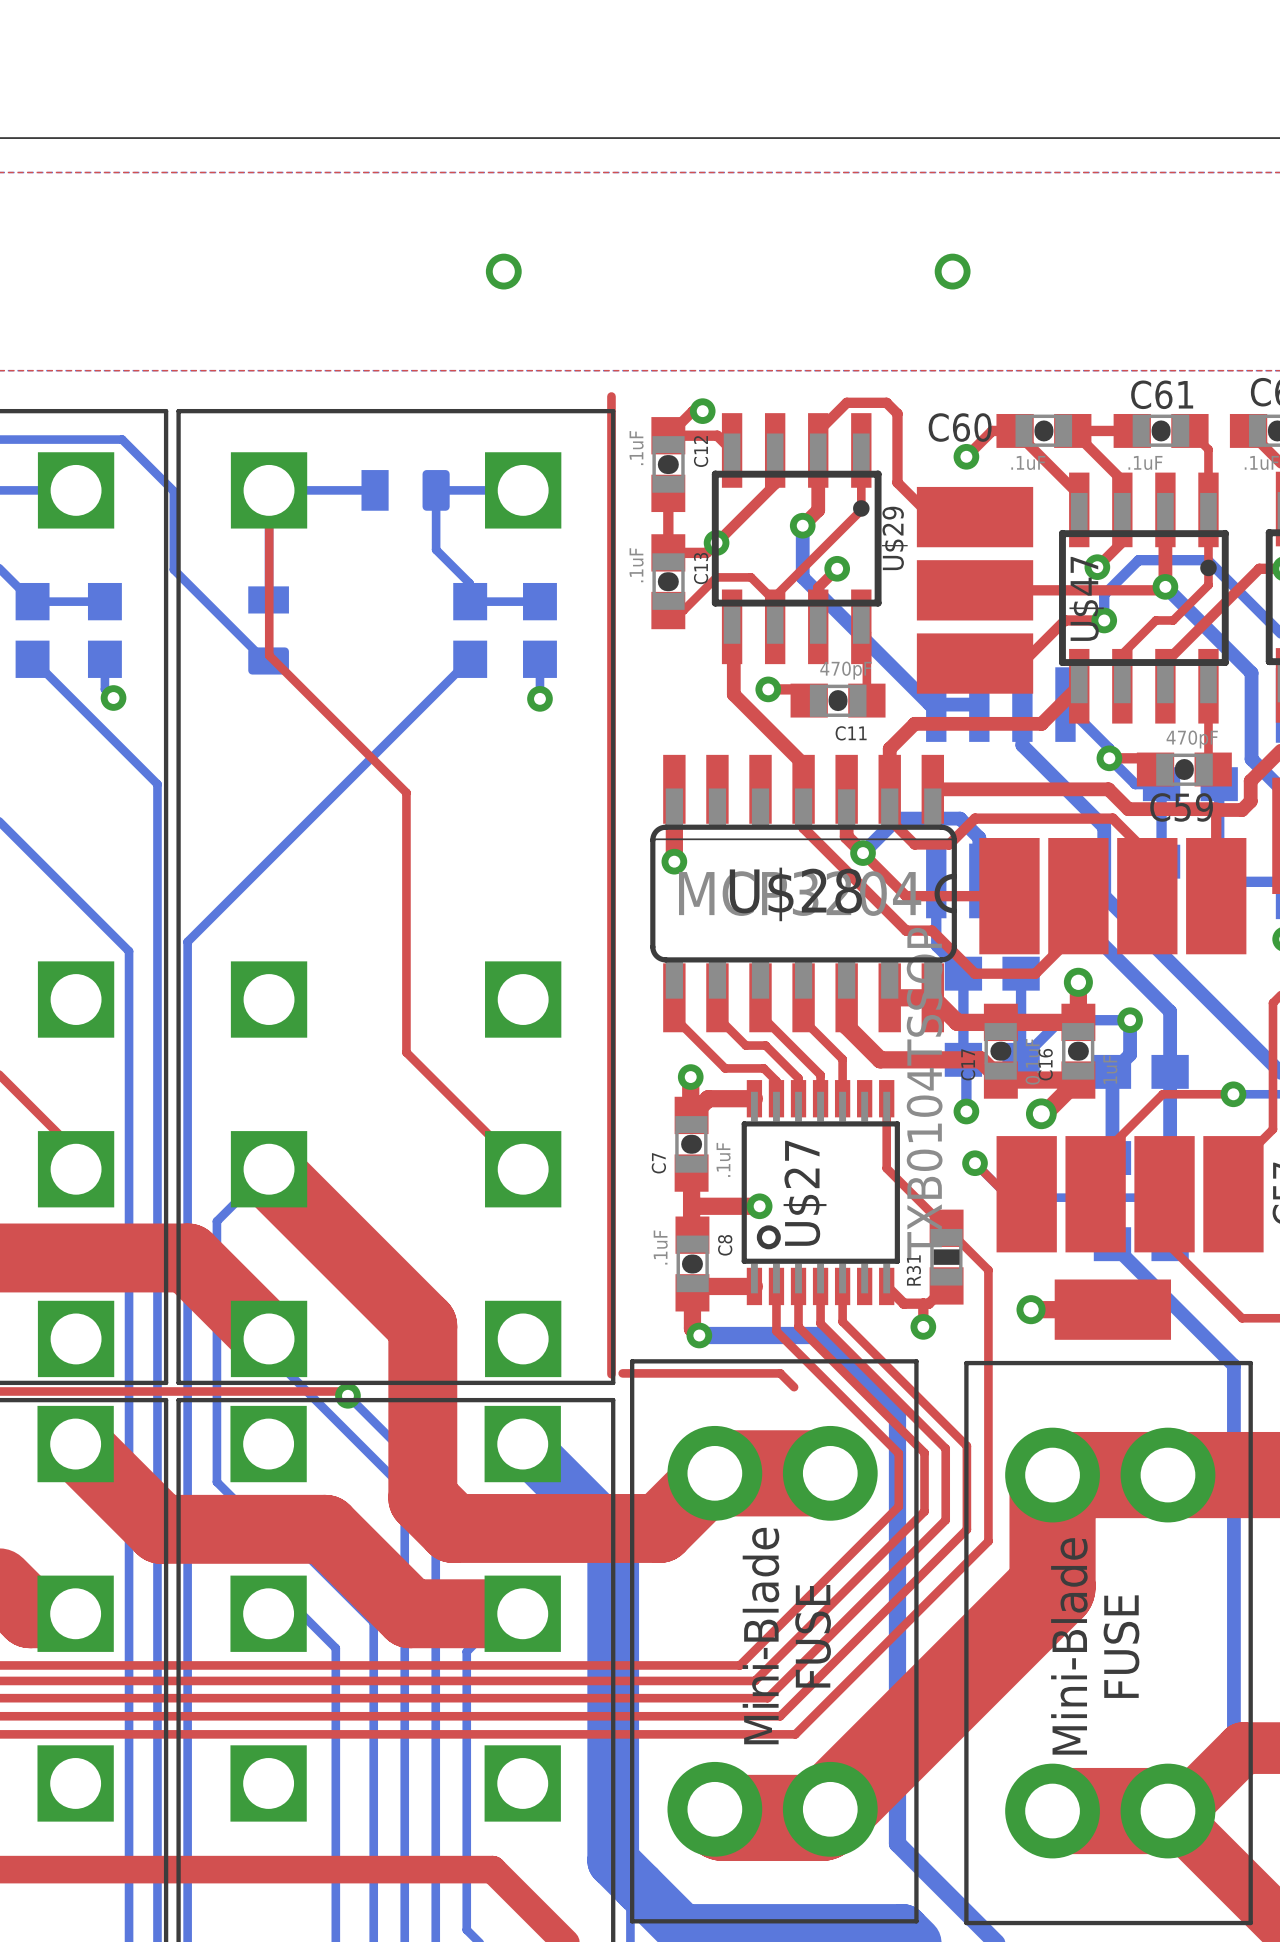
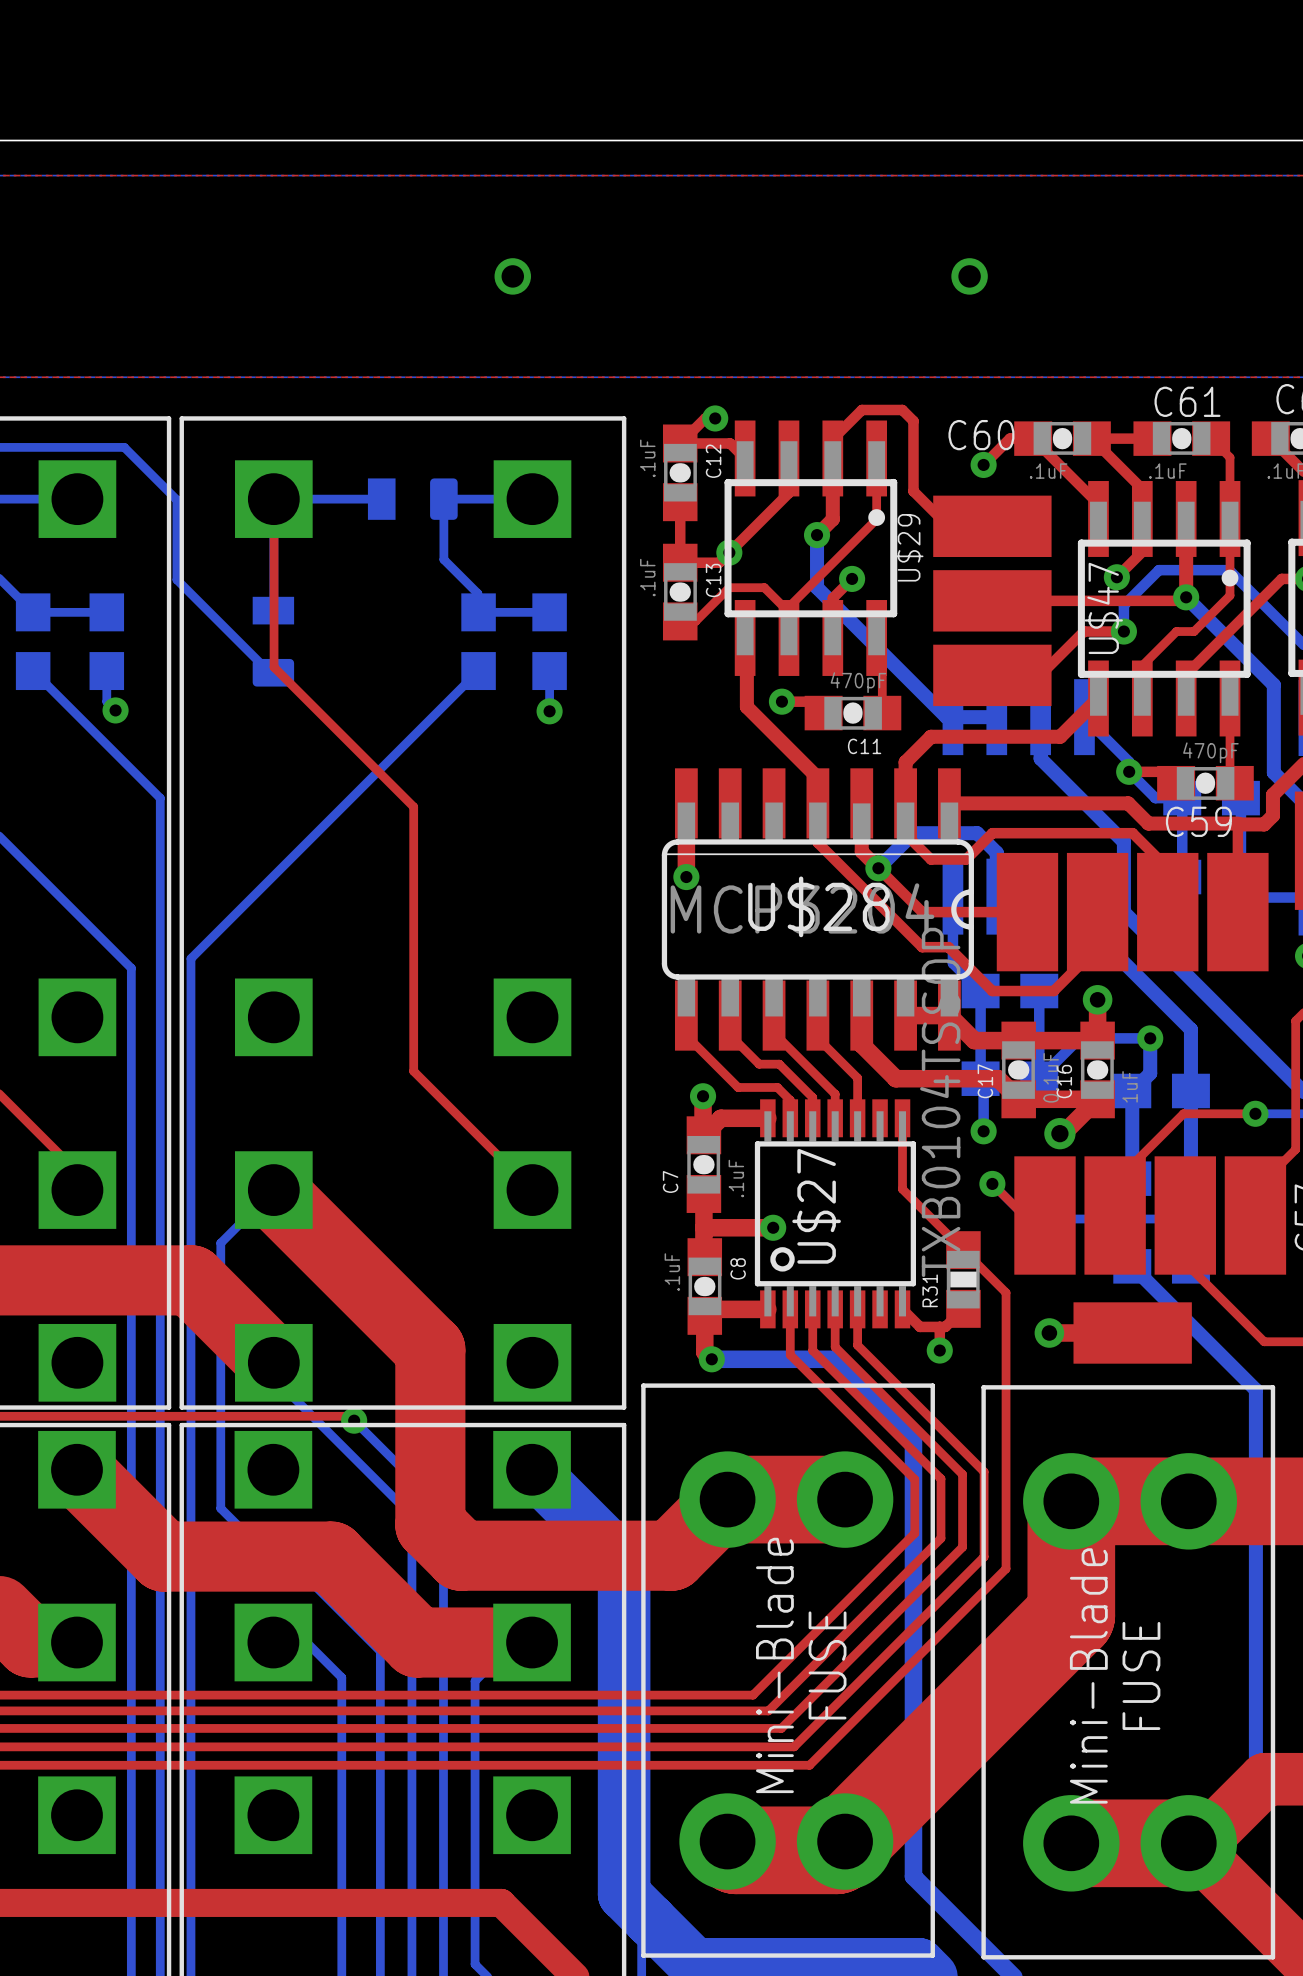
top track: (611, 396) (611, 1374) -> none
top track: (622, 1373) (780, 1373) (794, 1387) -> none

